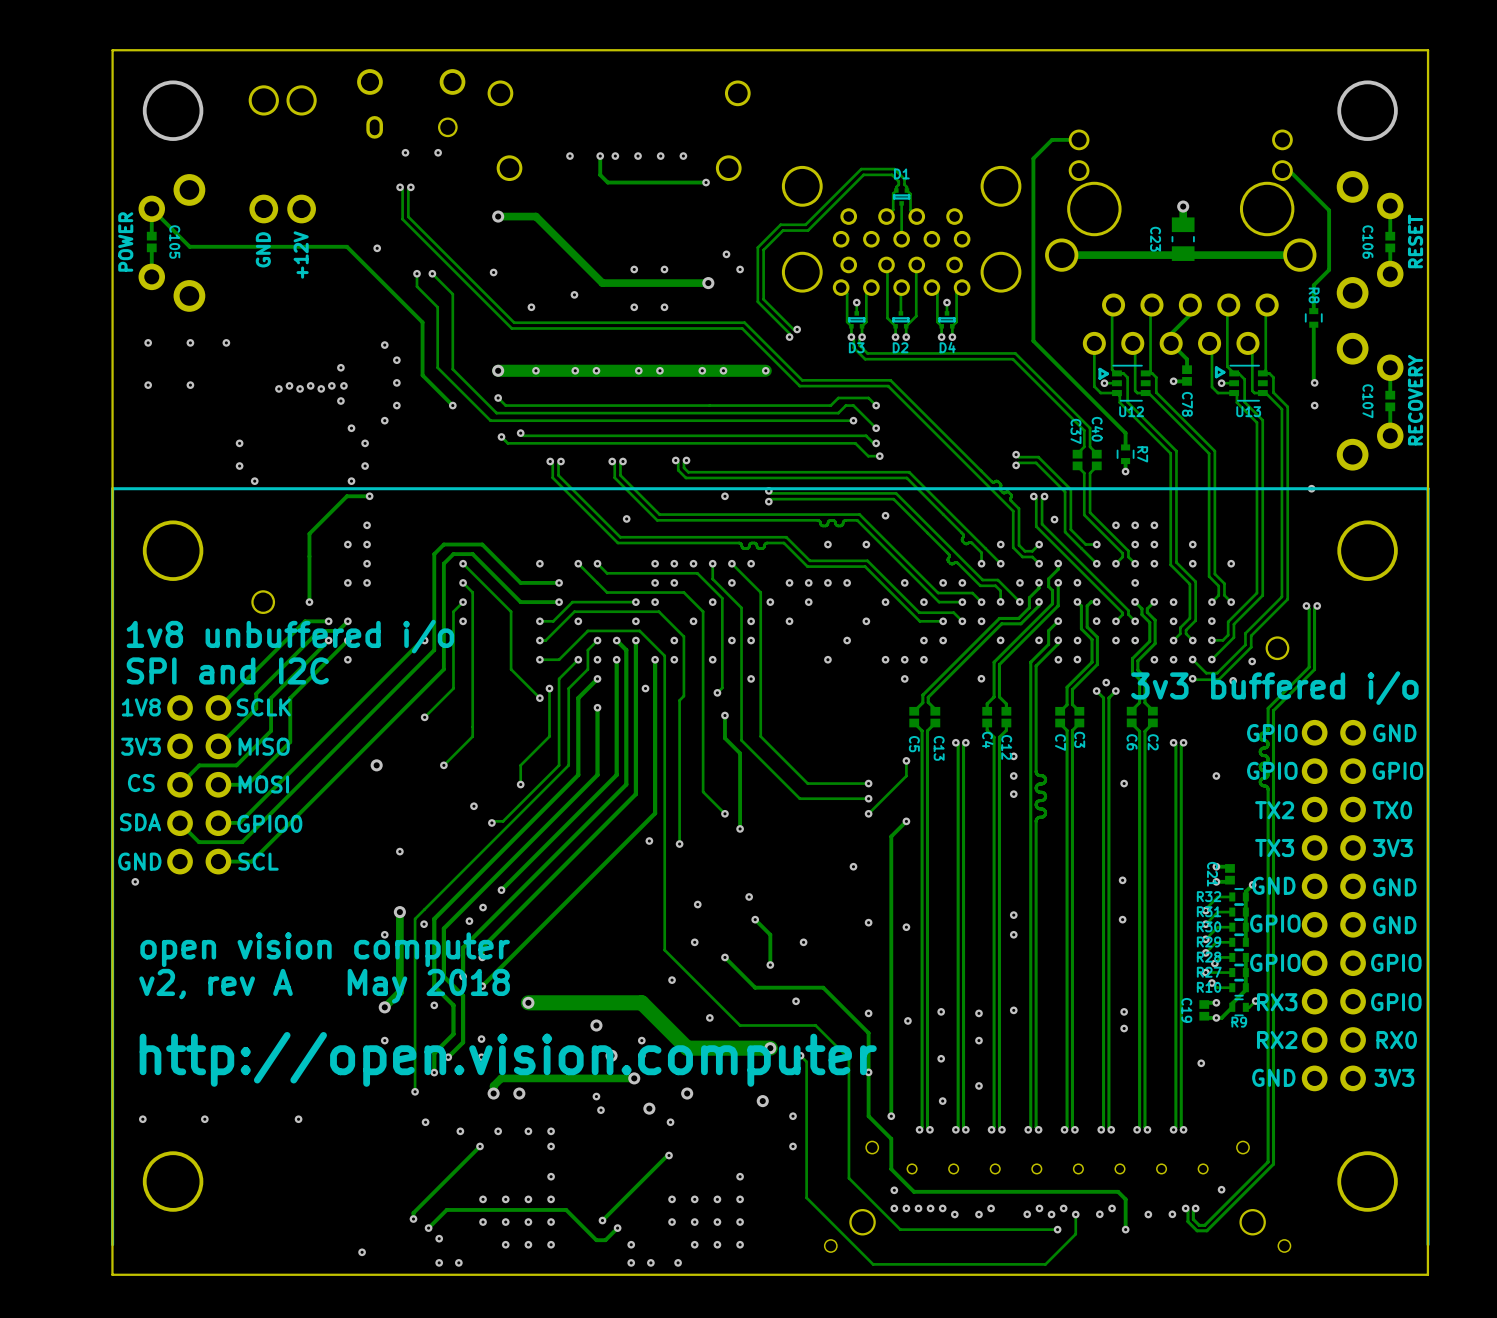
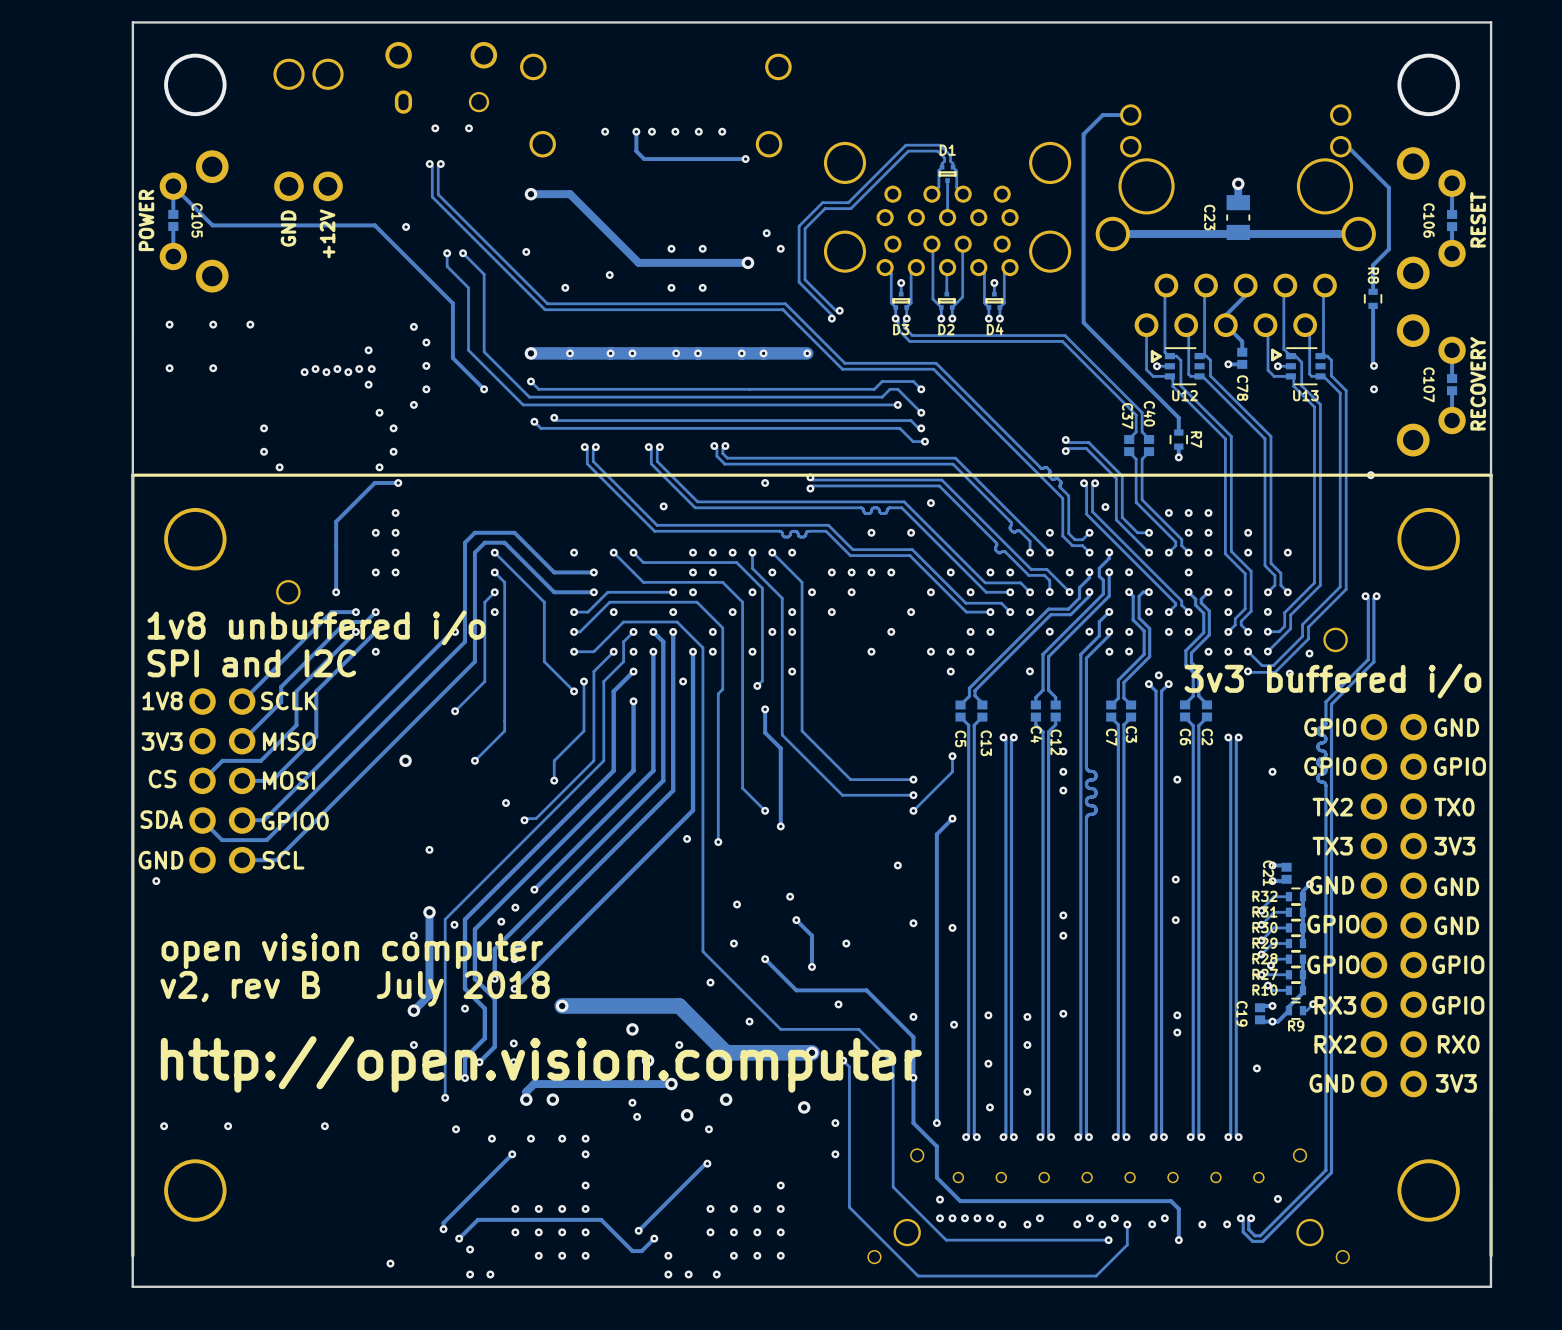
text: v2, rev A May 2018 (324, 986) -> v2, rev B July 2018 (355, 988)

